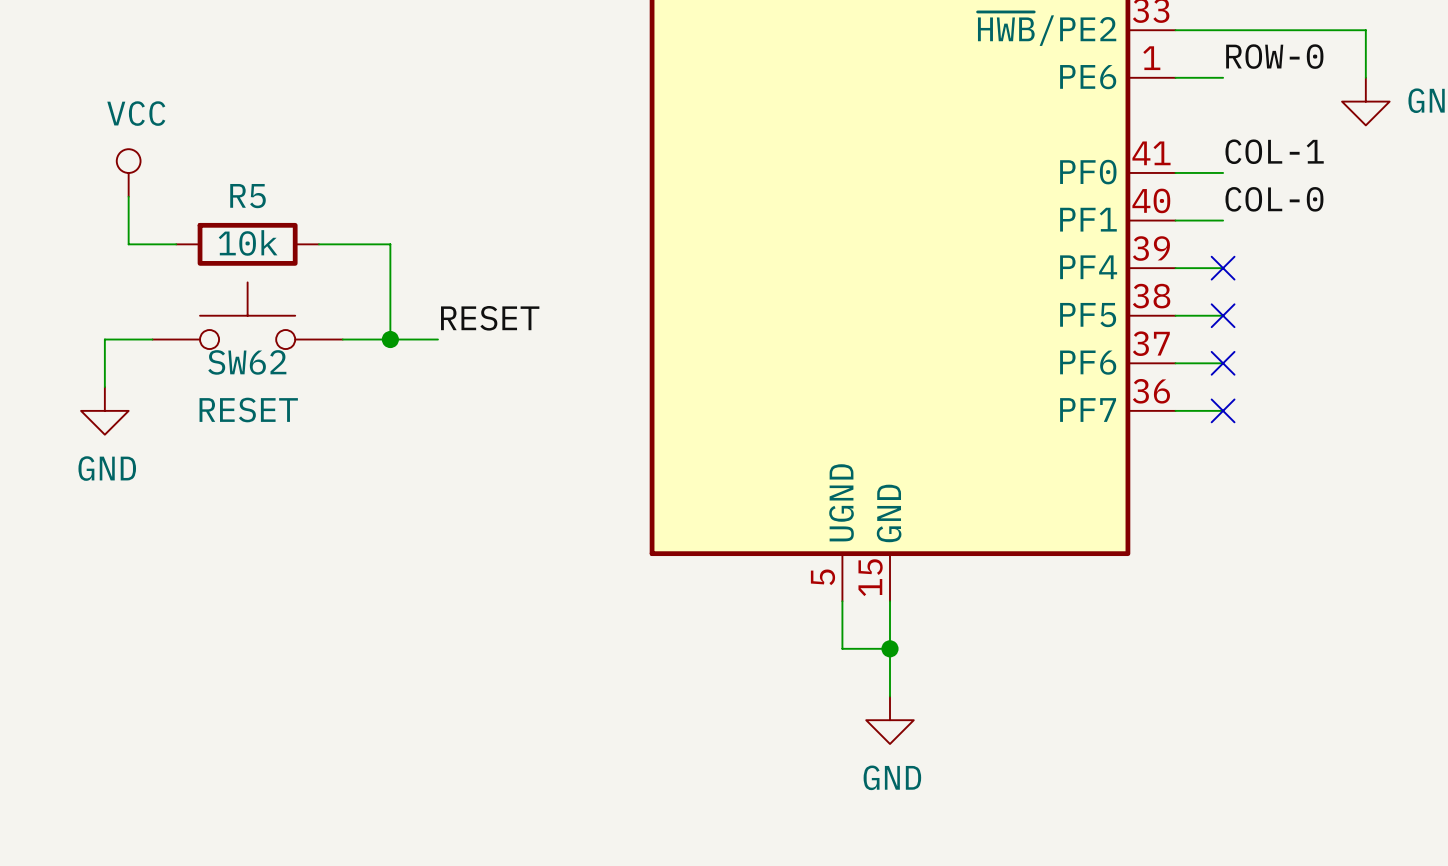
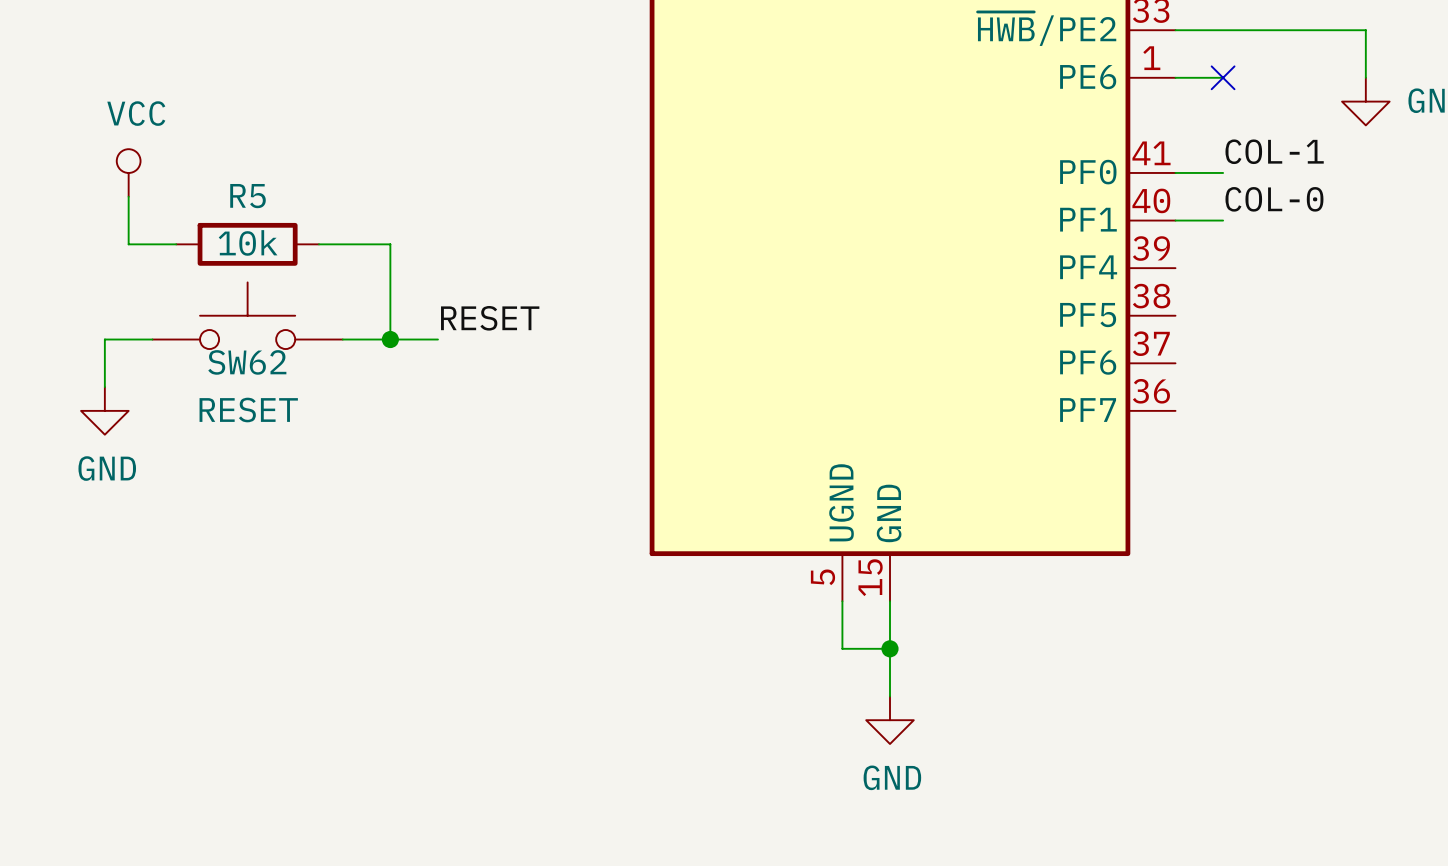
label: ROW-0 (1274, 56) -> none
no-connect mark: none -> (1223, 77)
wire: (1175, 268) (1223, 268) -> none
no-connect mark: (1223, 268) -> none
wire: (1175, 315) (1223, 315) -> none
no-connect mark: (1223, 315) -> none
wire: (1175, 363) (1223, 363) -> none
no-connect mark: (1223, 363) -> none
wire: (1175, 410) (1223, 410) -> none
no-connect mark: (1223, 410) -> none

